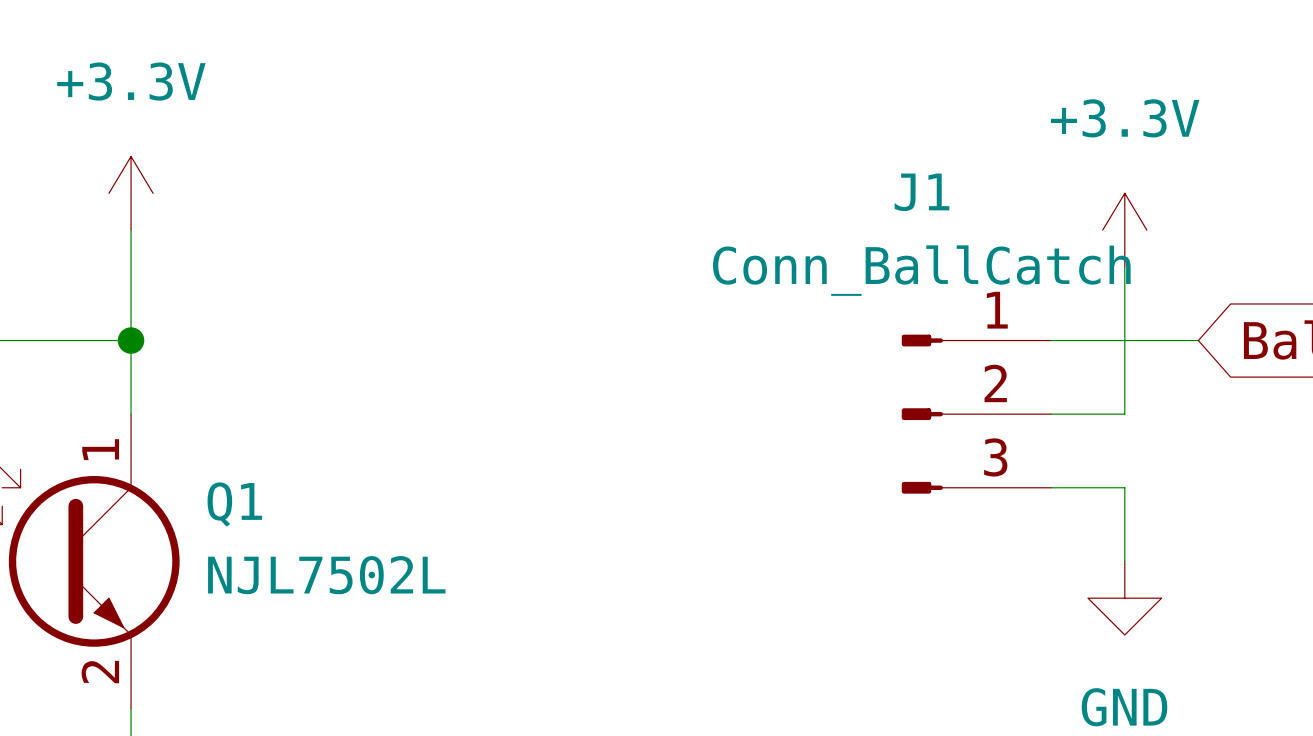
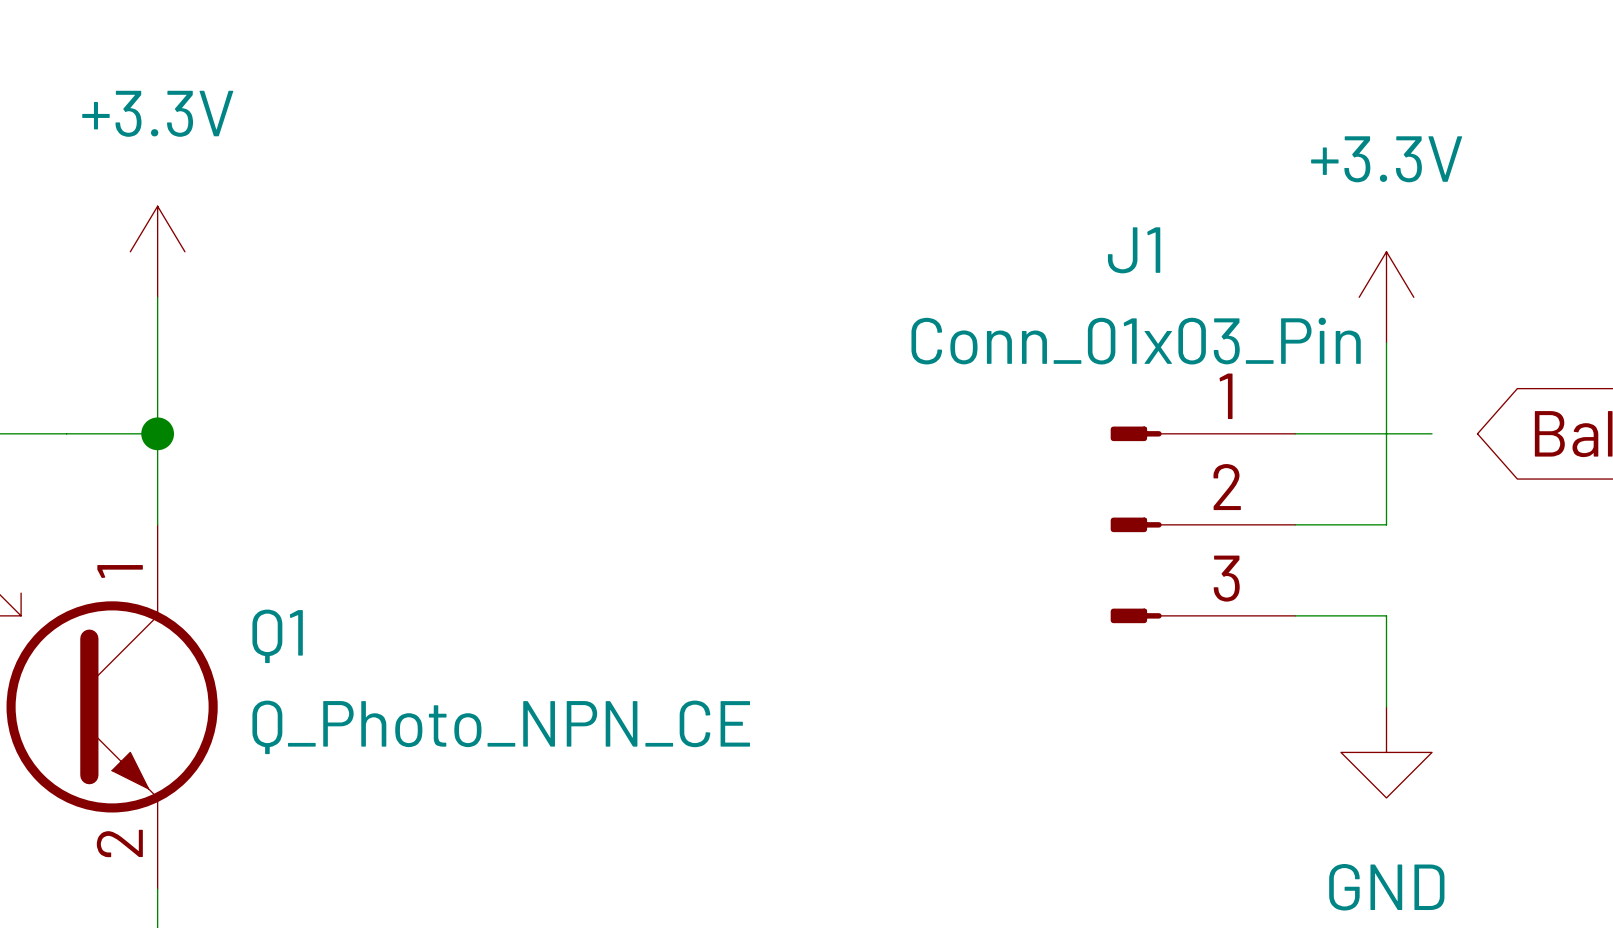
J1 value: Conn_BallCatch (921, 270) -> Conn_01x03_Pin (1136, 341)
wire: (1161, 340) (1198, 340) -> none
Q1 value: NJL7502L (326, 575) -> Q_Photo_NPN_CE (501, 727)

